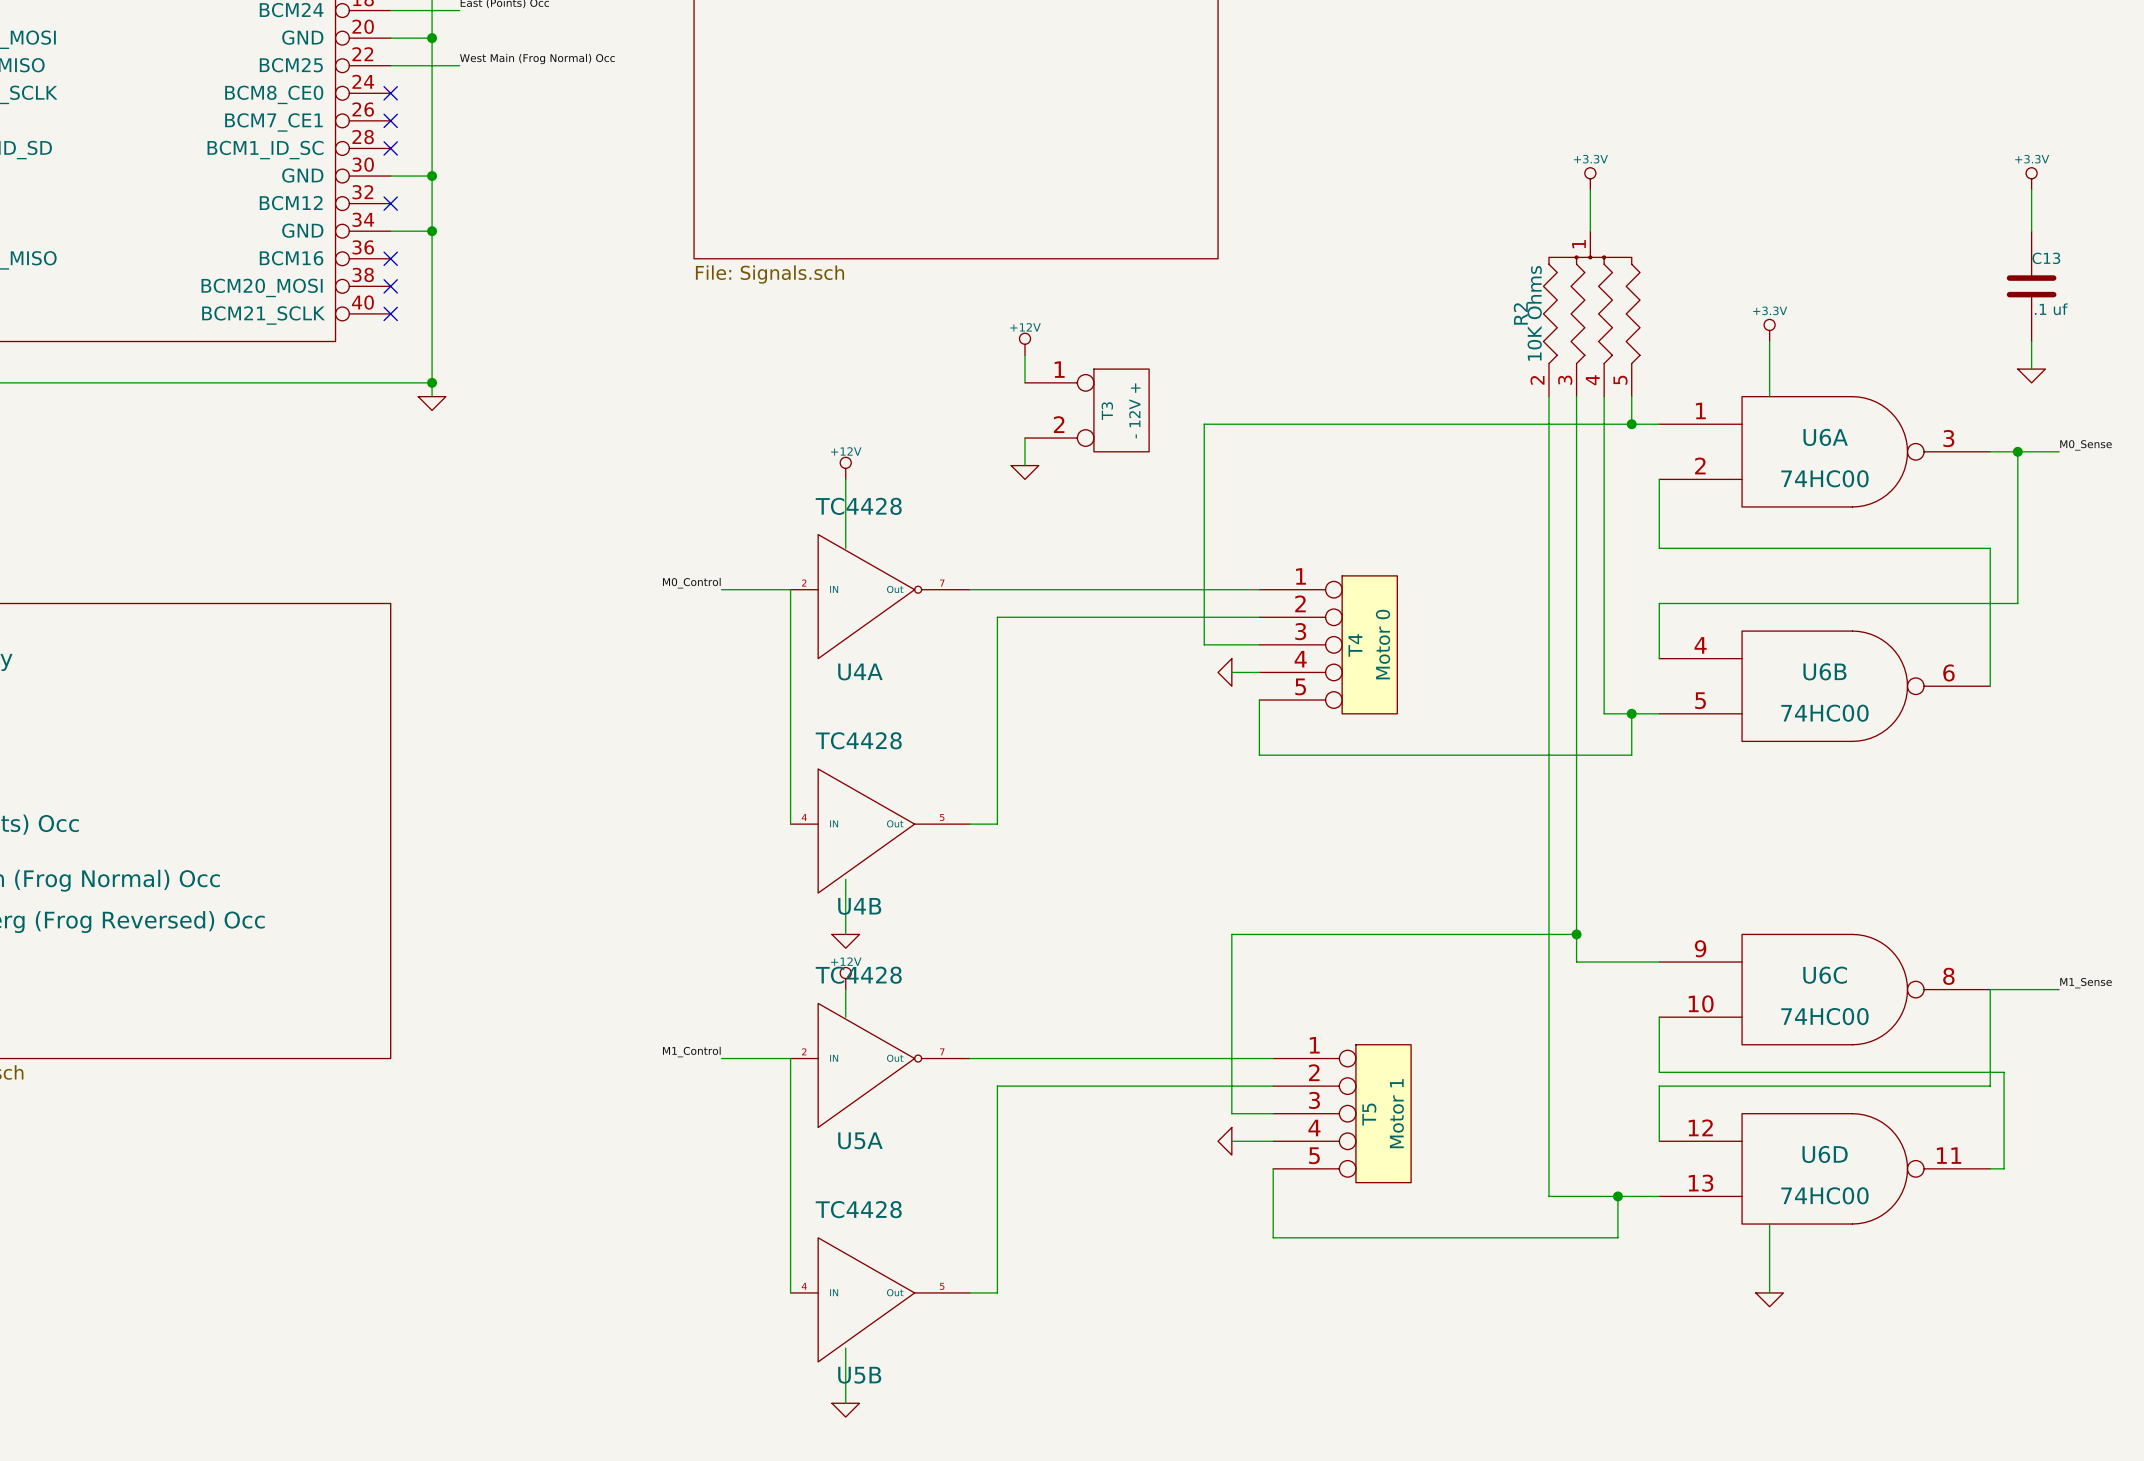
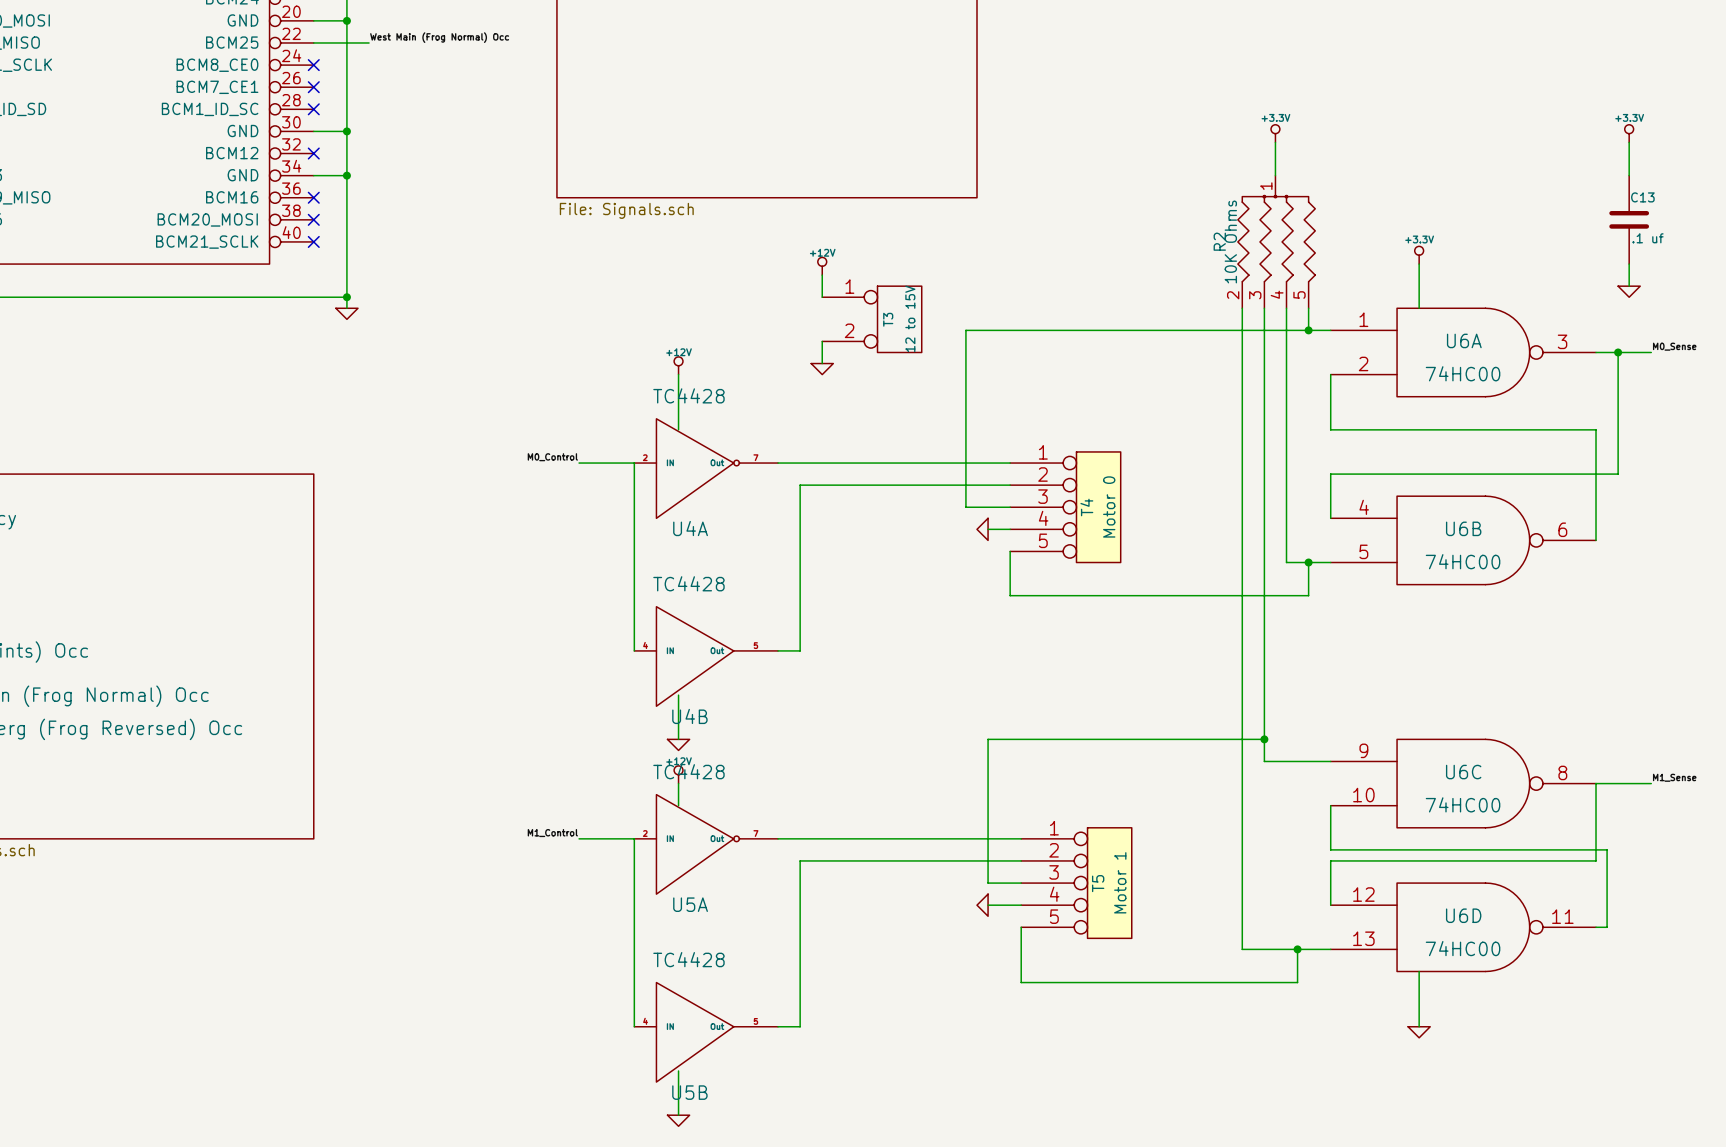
T3 value: - 12V + (1134, 410) -> 12 to 15V (910, 318)

